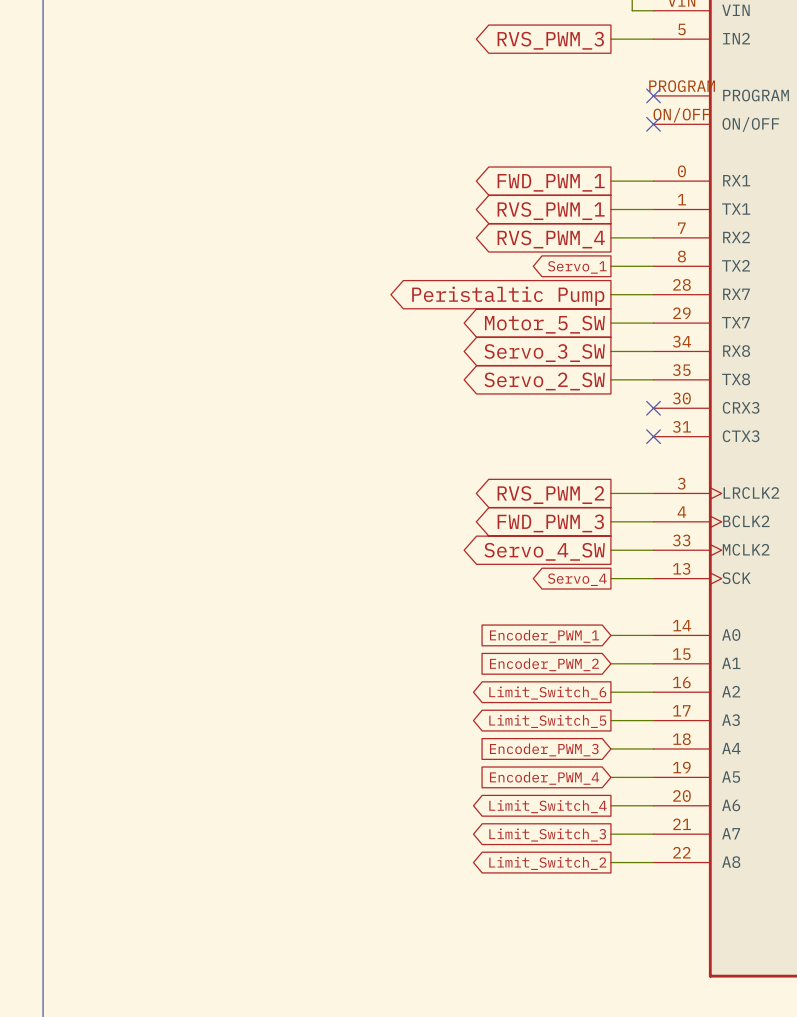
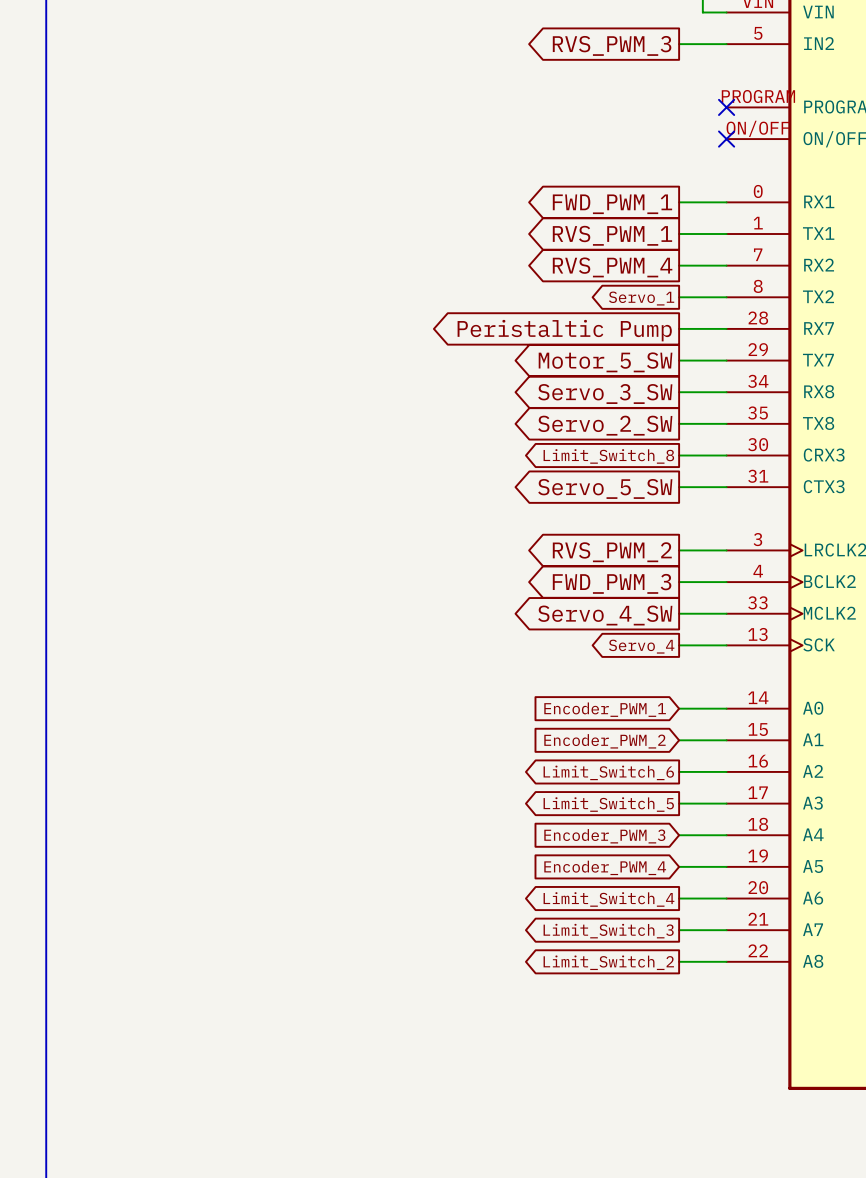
wire: none -> (679, 455) (726, 455)
no-connect mark: (653, 408) -> none
global label: none -> Limit_Switch_8 (608, 456)
wire: none -> (679, 487) (726, 487)
no-connect mark: (653, 436) -> none
global label: none -> Servo_5_SW (605, 488)

